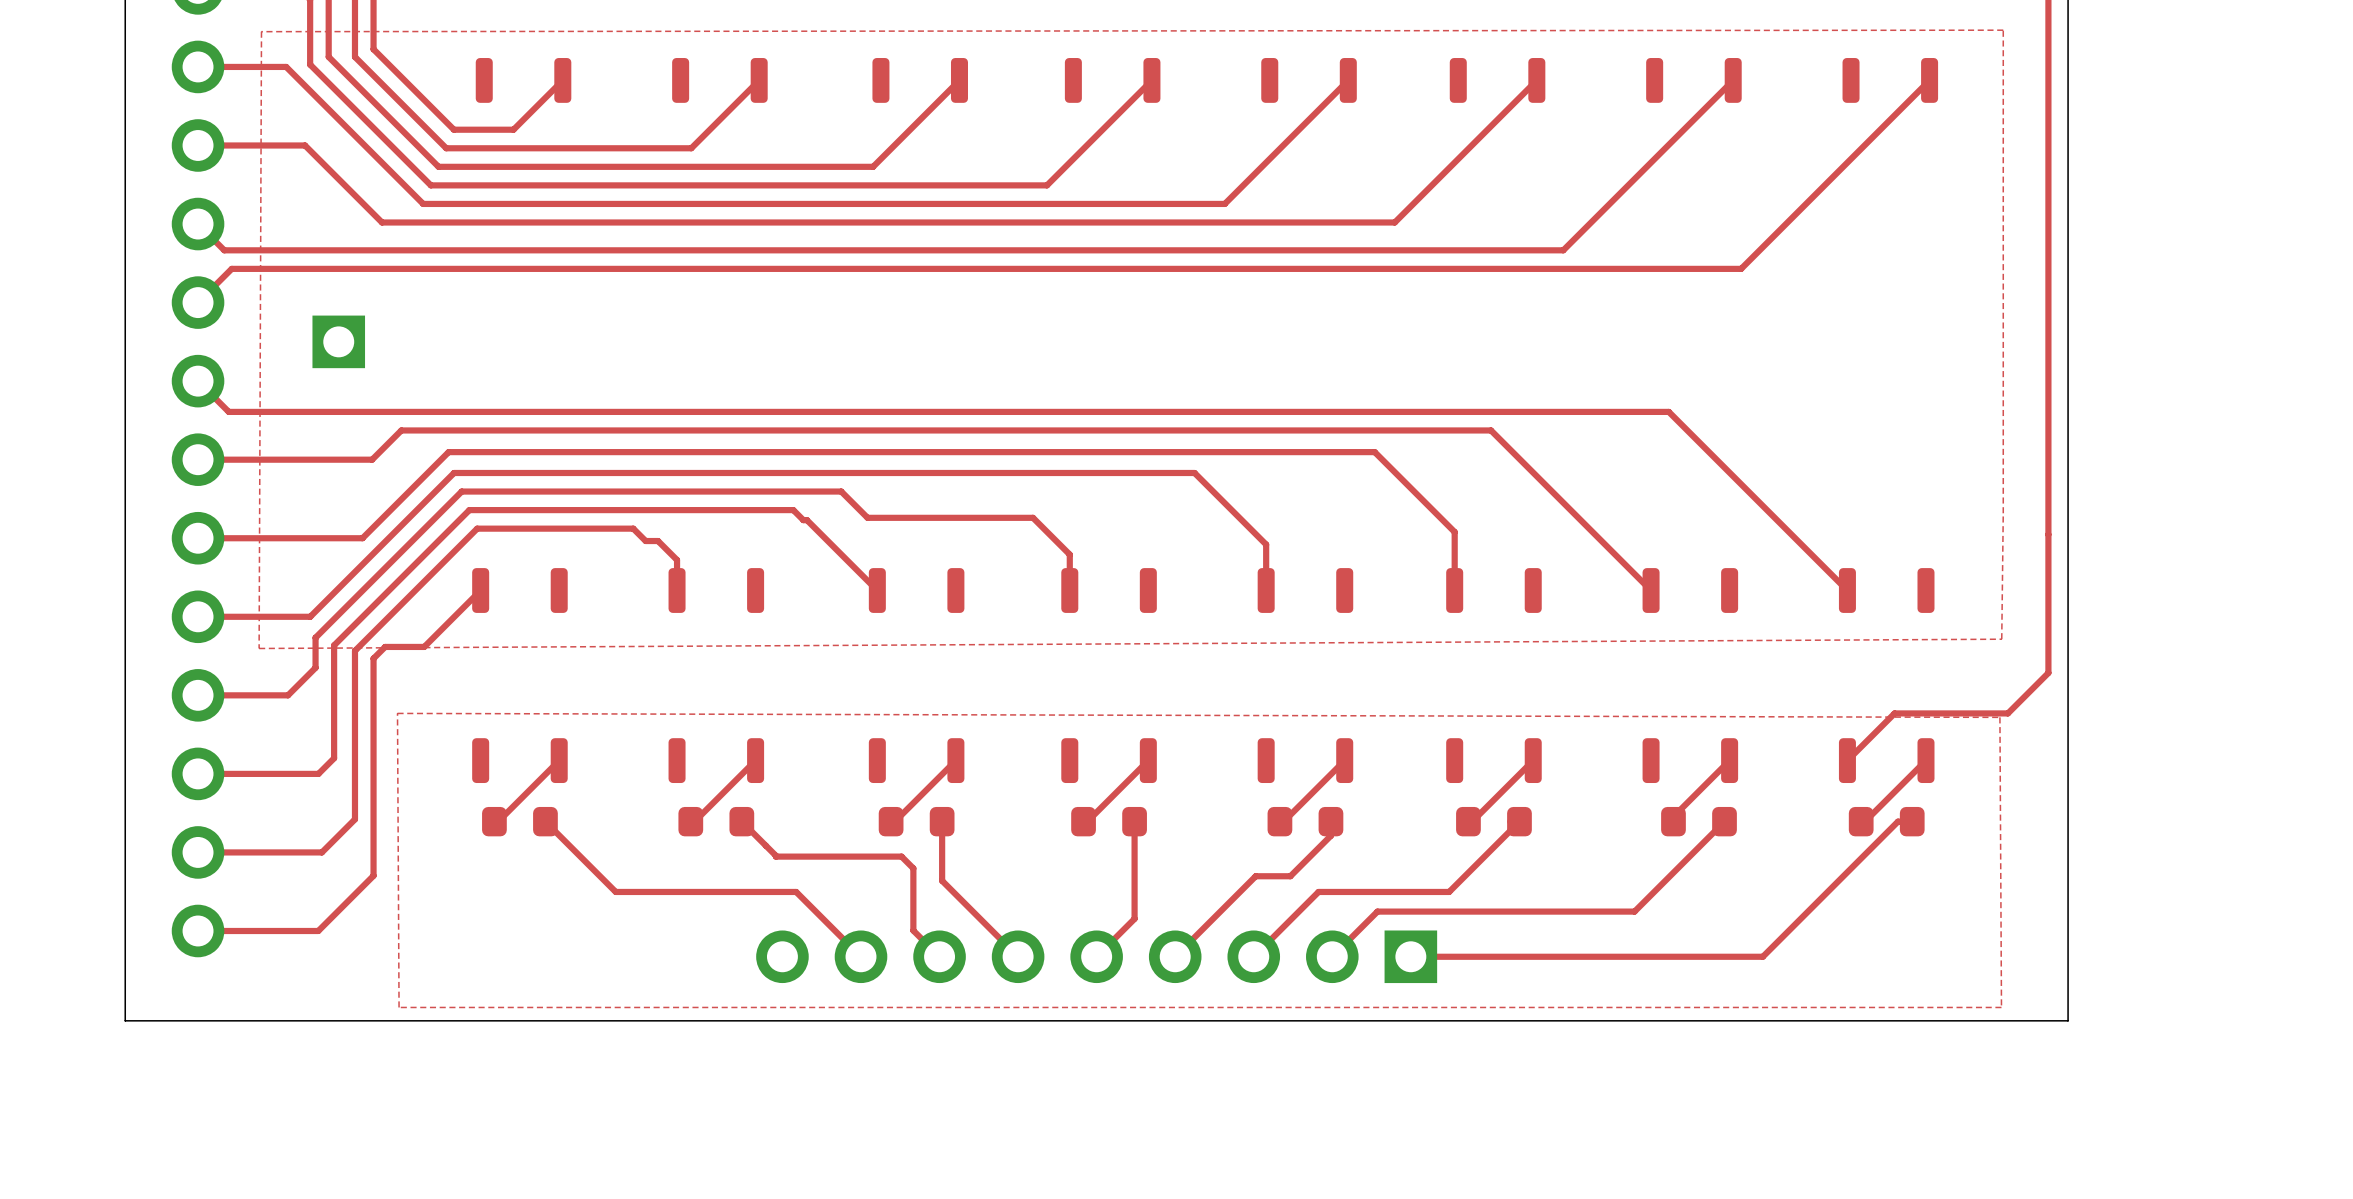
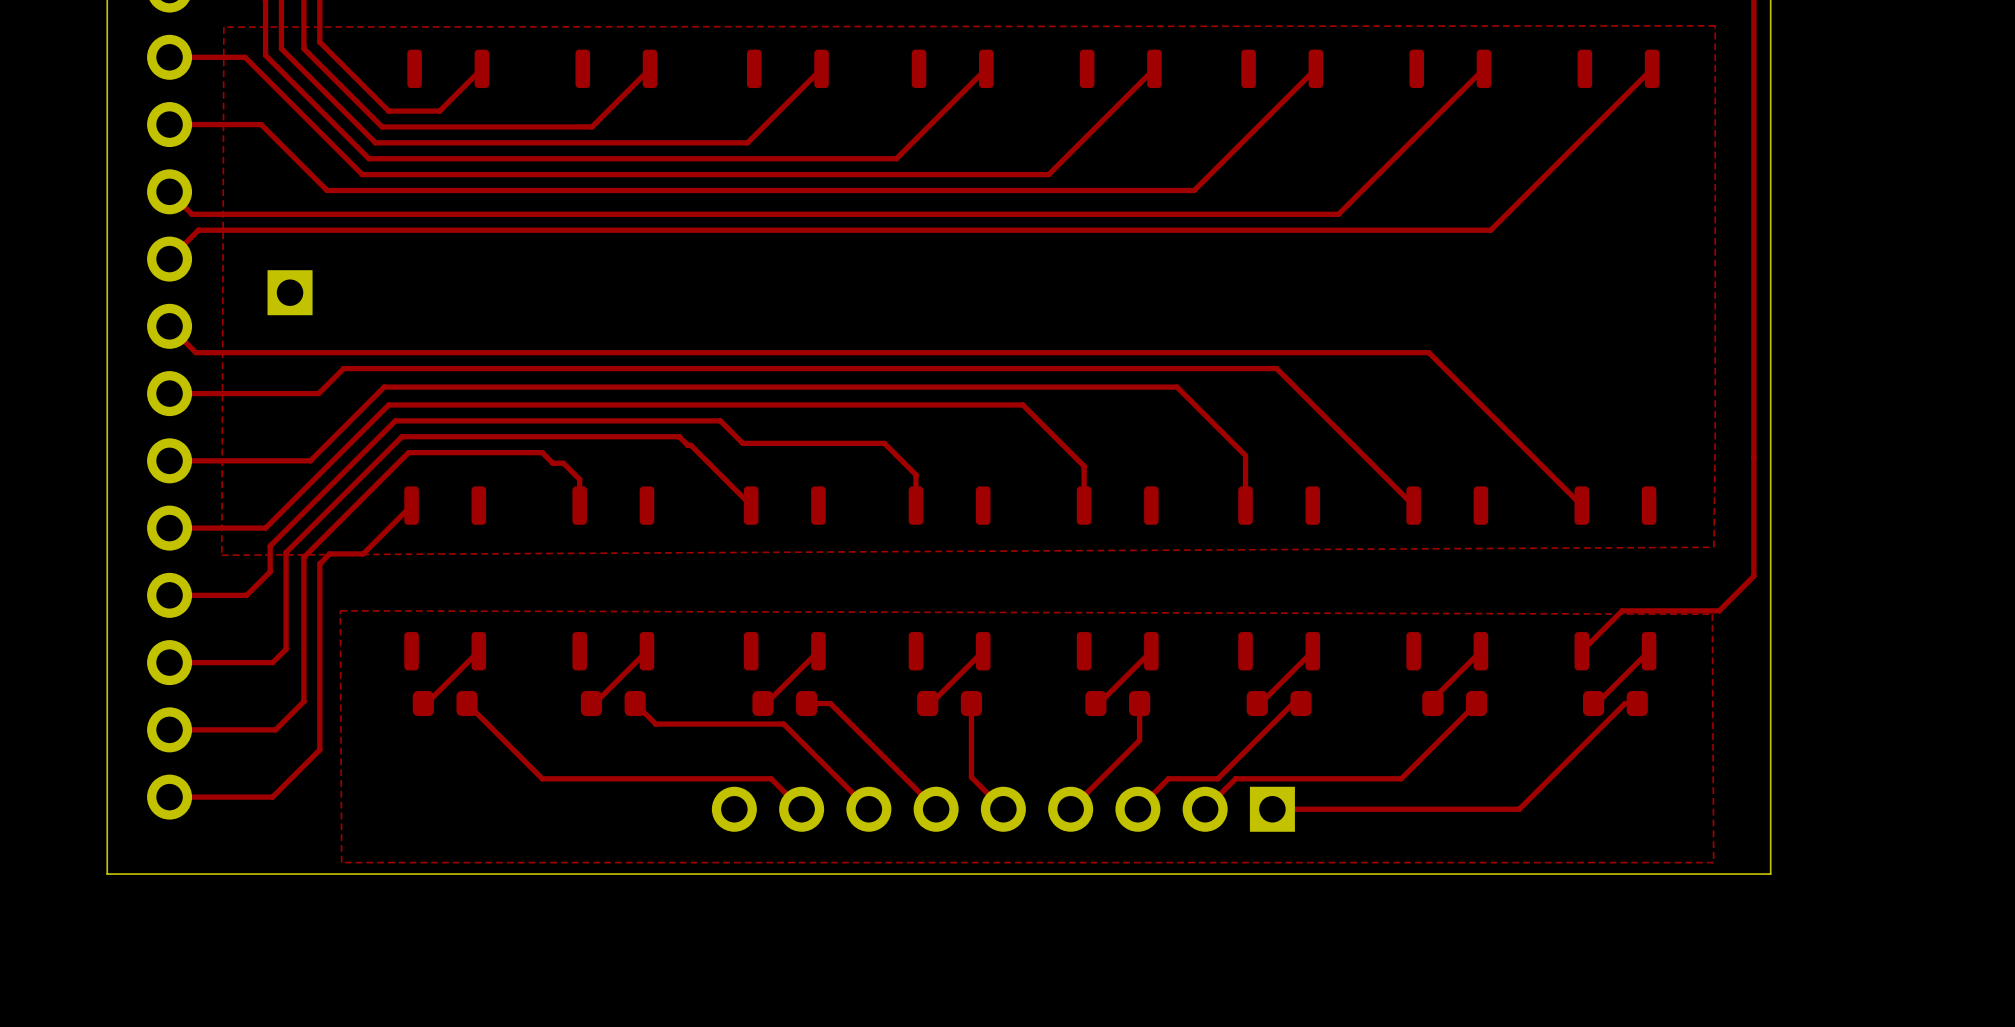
top track: (942, 821) (942, 880) (1018, 956) -> (806, 703) (830, 703) (936, 809)
top track: none -> (1293, 703) (1217, 778) (1168, 778) (1137, 809)
top track: (1519, 821) (1449, 891) (1318, 891) (1253, 956) -> none
top track: (1330, 835) (1290, 876) (1255, 876) (1175, 956) -> (1139, 715) (1139, 740) (1070, 809)
top track: (765, 845) (775, 856) (901, 856) (913, 868) (913, 930) (939, 956) -> (655, 724) (783, 724) (868, 809)
top track: (615, 891) (796, 891) (861, 956) -> (527, 763) (542, 778) (771, 778) (801, 809)
top track: (1134, 907) (1134, 918) (1096, 956) -> (971, 777) (1003, 809)
top track: (1636, 909) (1634, 911) (1377, 911) (1332, 956) -> (1401, 778) (1235, 778) (1205, 809)
top track: (1774, 945) (1762, 956) (1410, 956) -> (1519, 809) (1272, 809)
part position: (1096, 956) -> (1003, 809)

